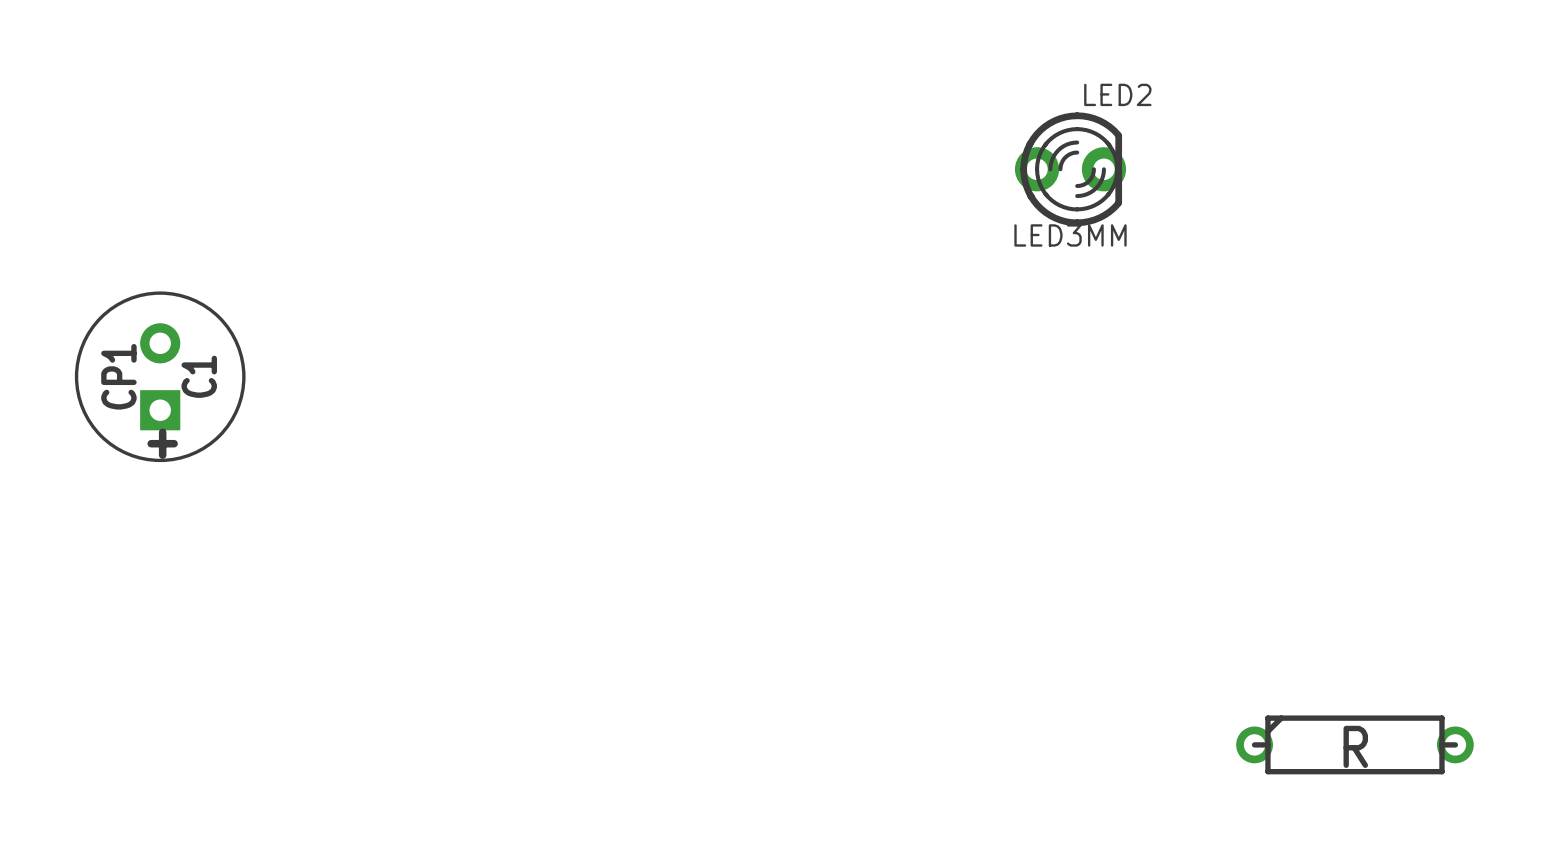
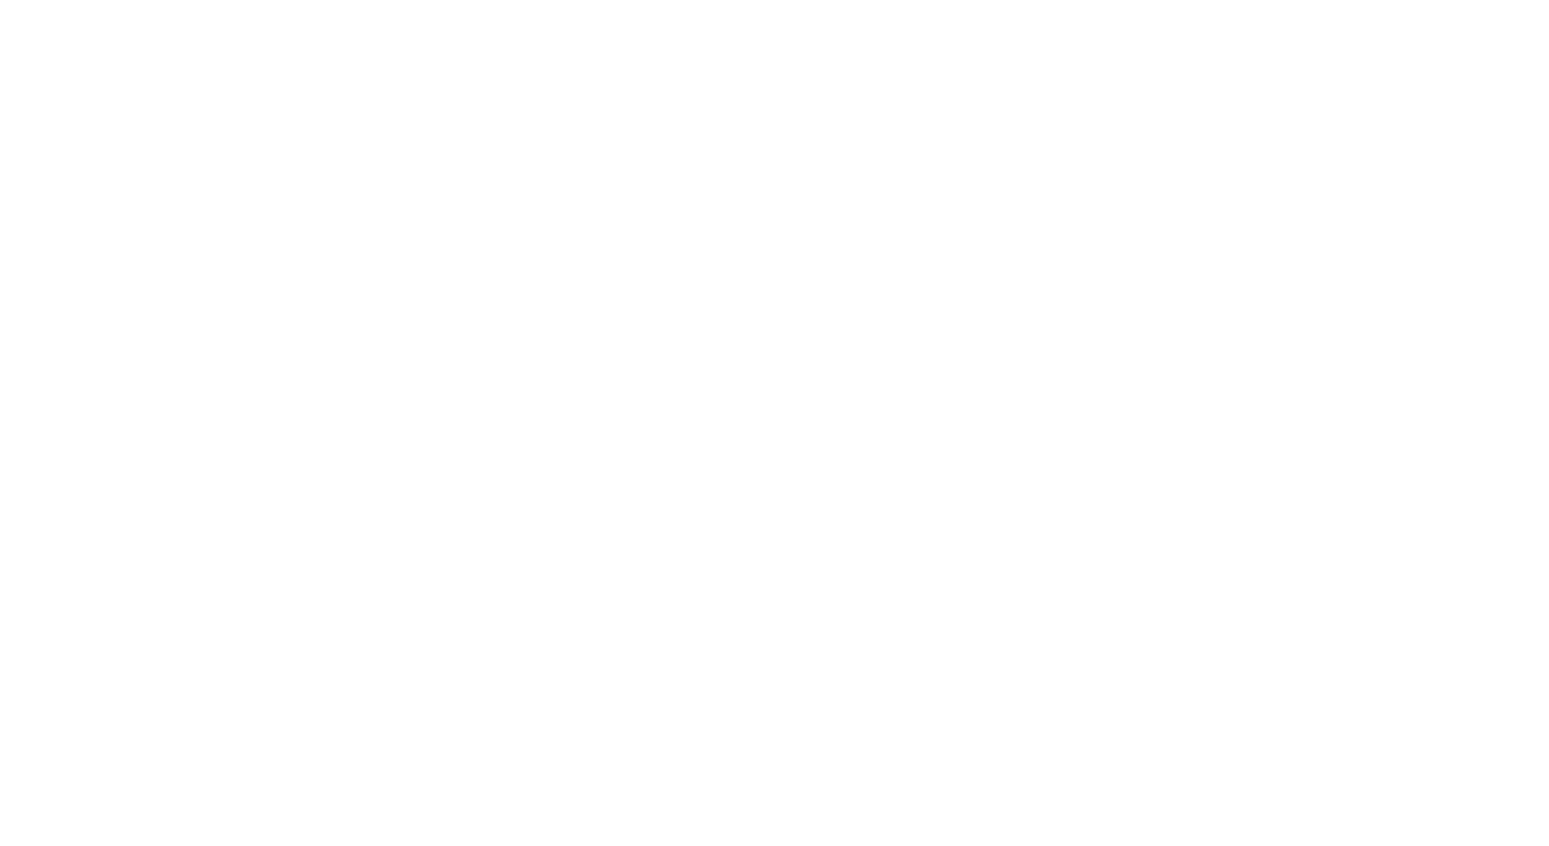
LED2: LED3MM (1070, 169) -> none
C1: CP1 (160, 376) -> none
part: R (1354, 744) -> none

